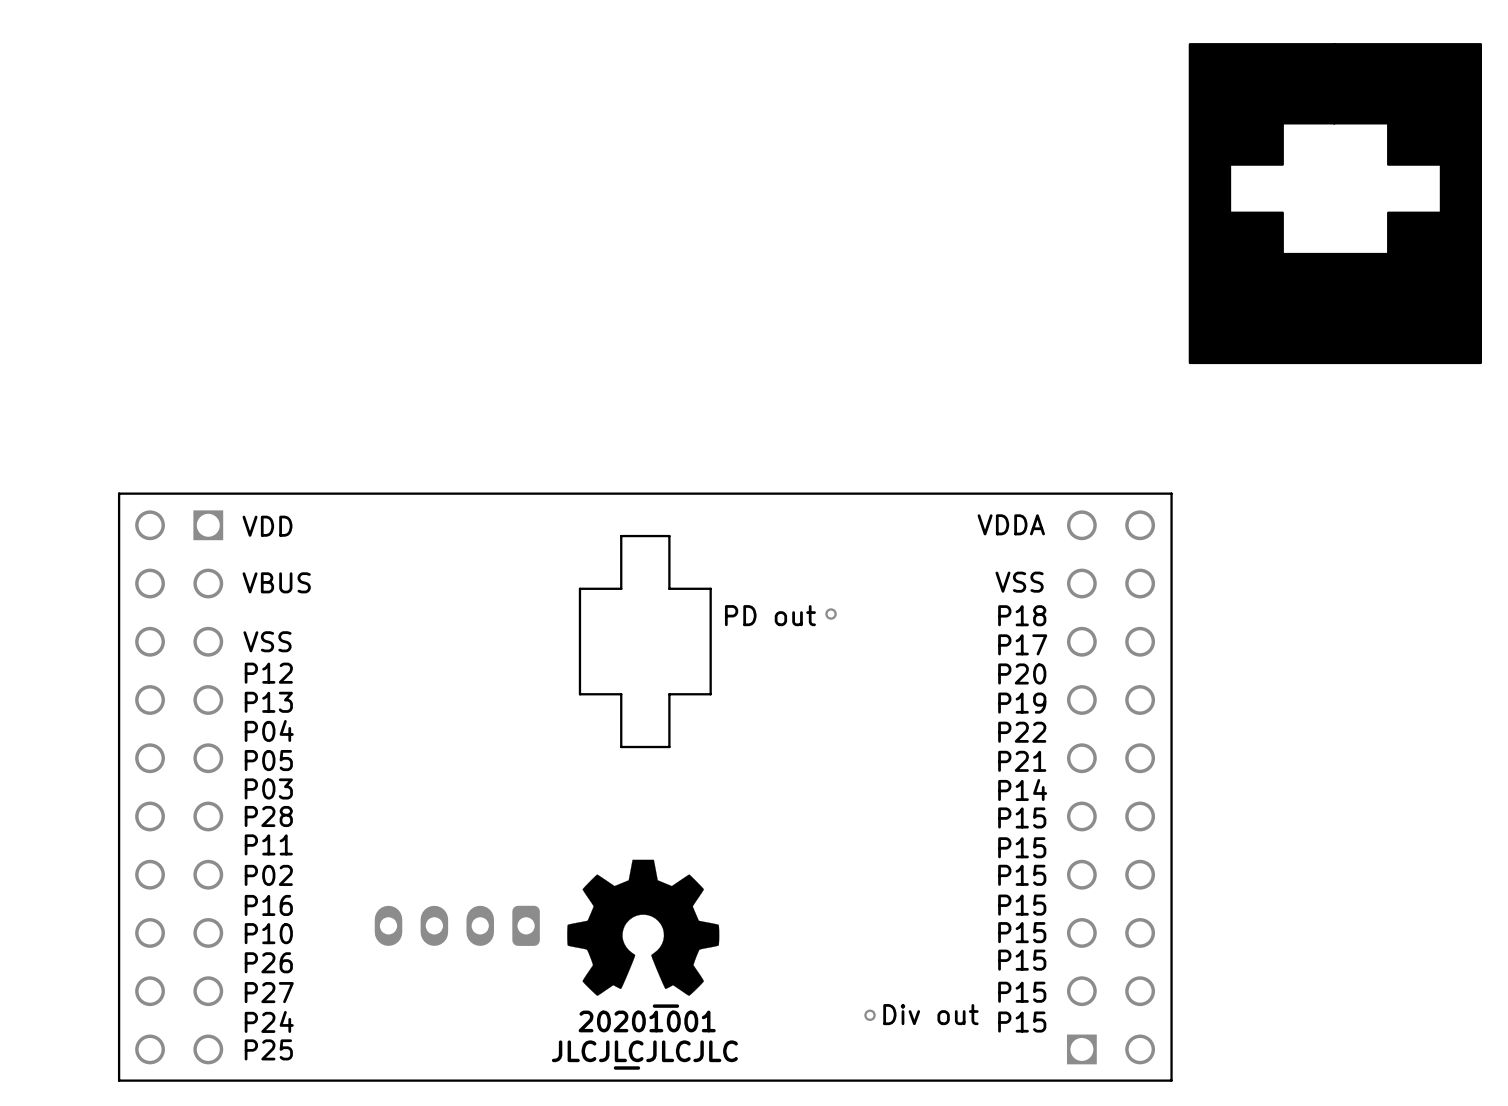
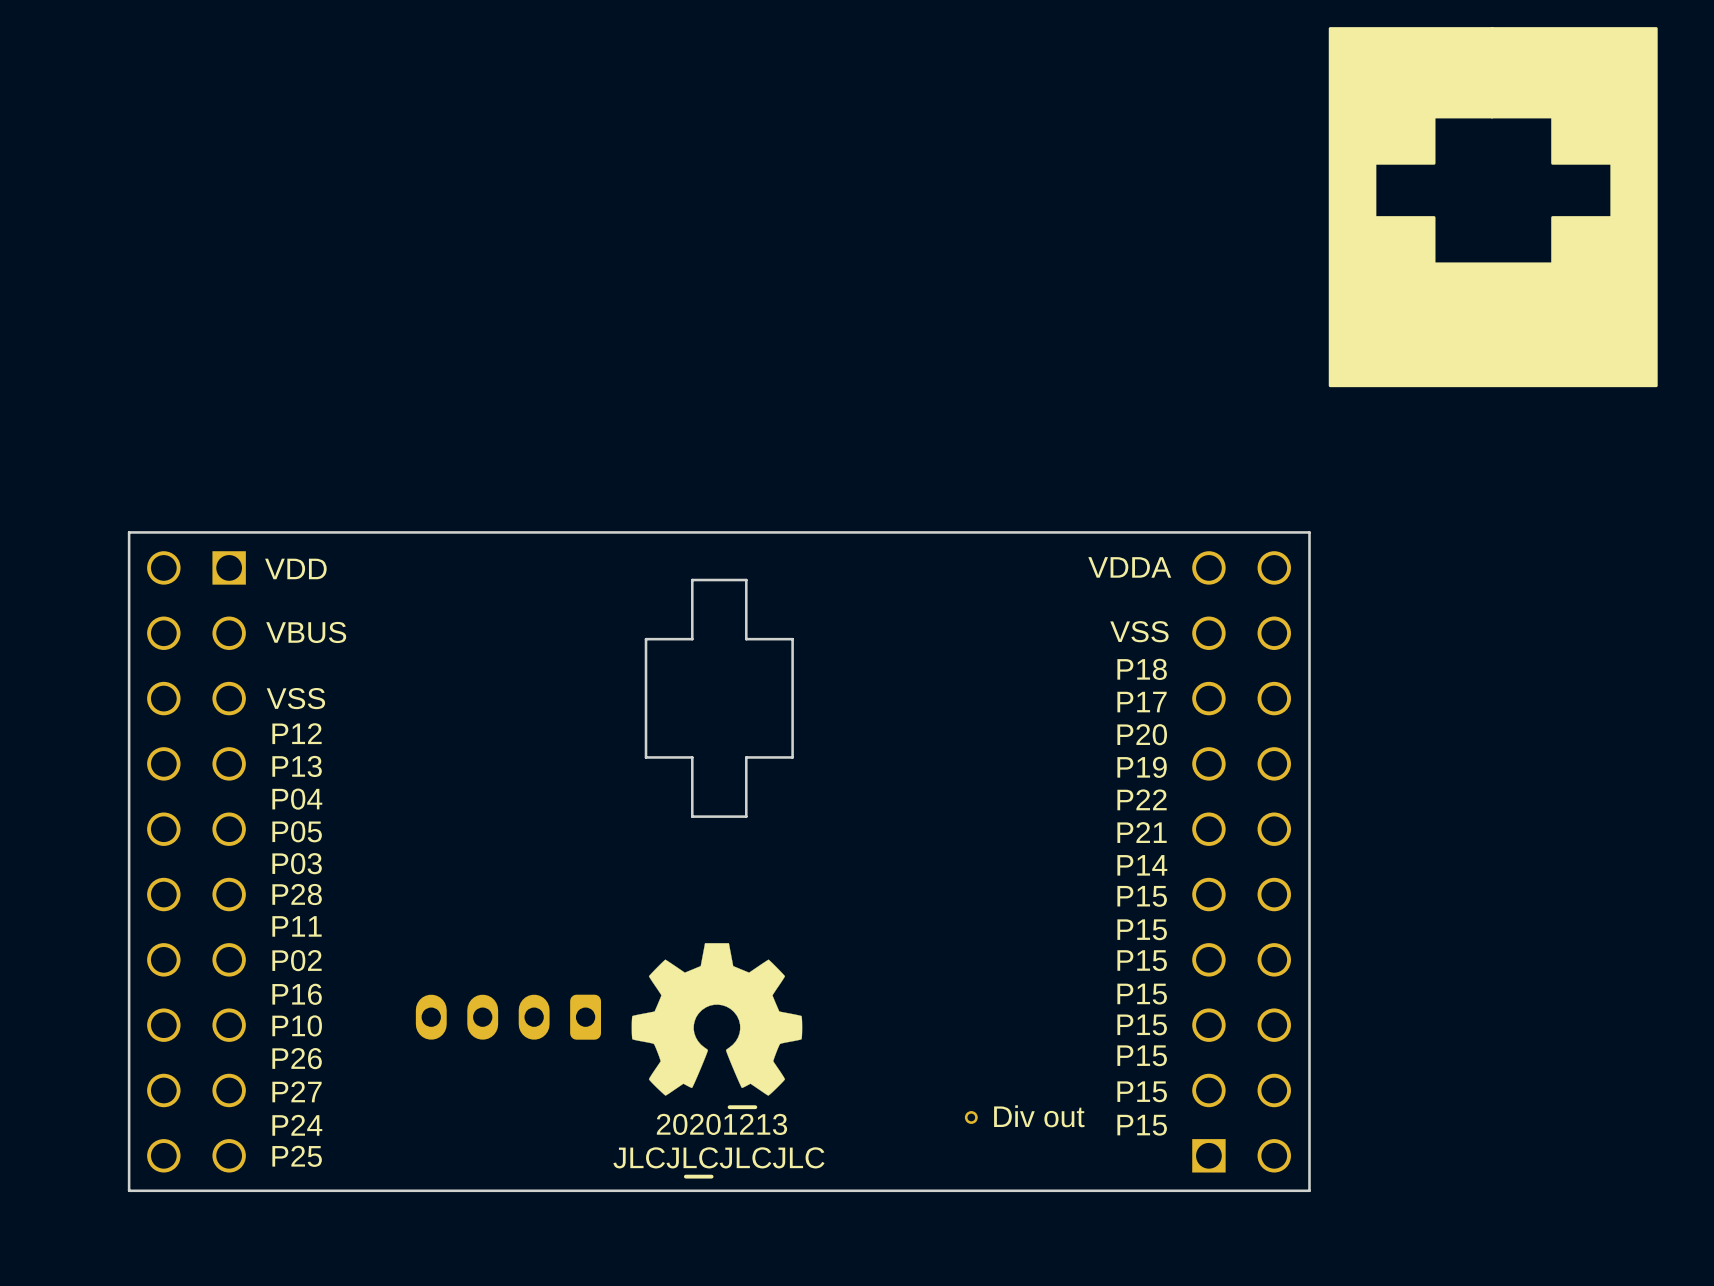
part: PD out (831, 614) -> none
drawing shape: [578, 1004, 716, 1033] -> [656, 1105, 788, 1136]

